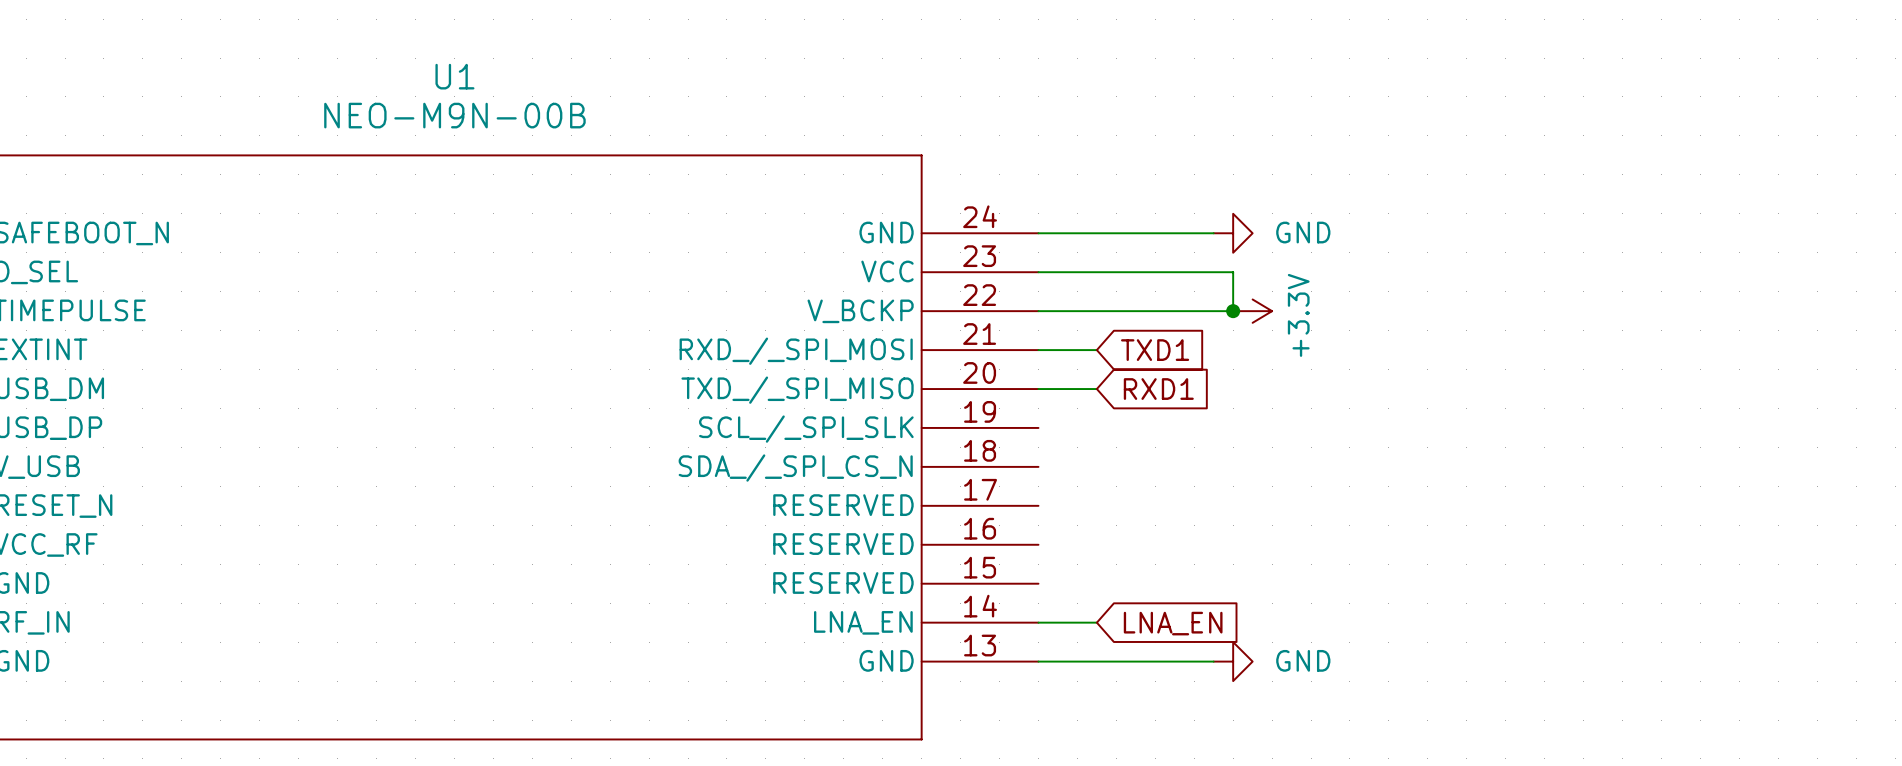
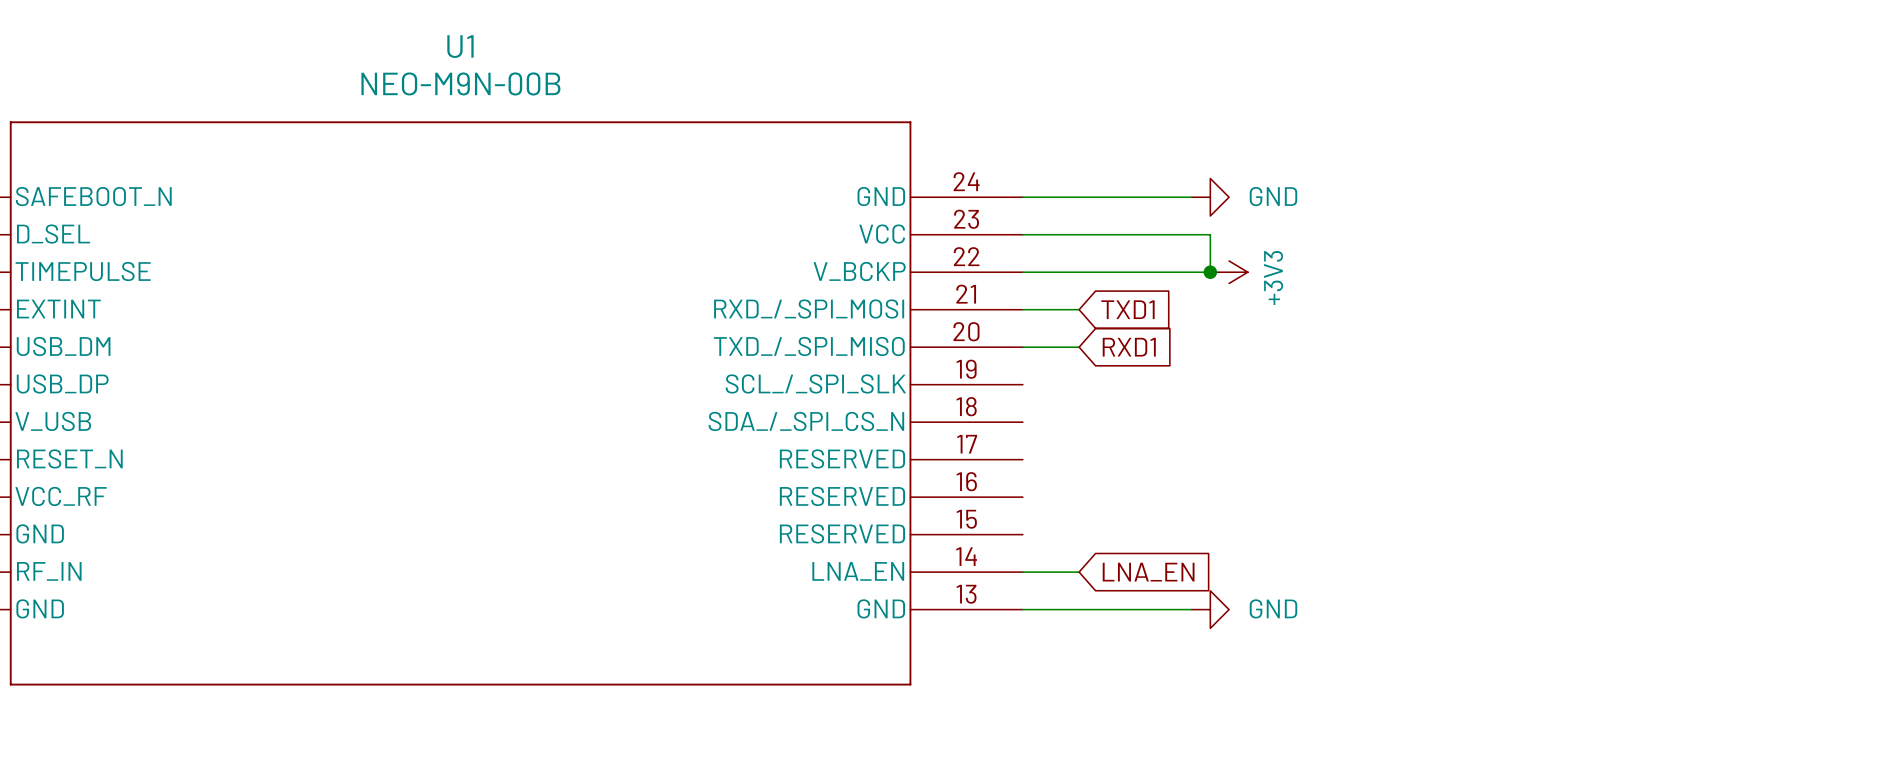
power symbol: +3.3V (1252, 311) -> +3V3 (1229, 272)

